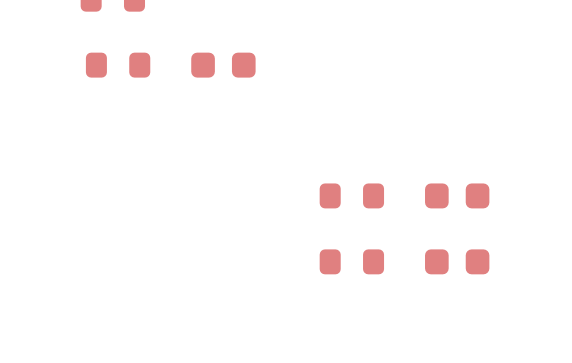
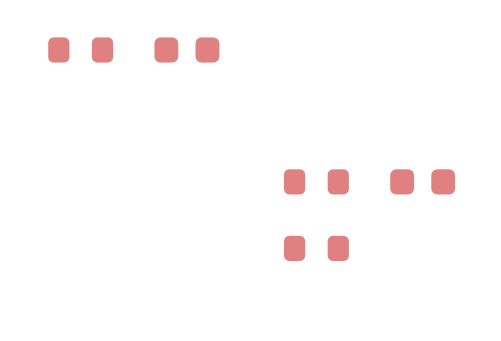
part: (457, 261) -> none

